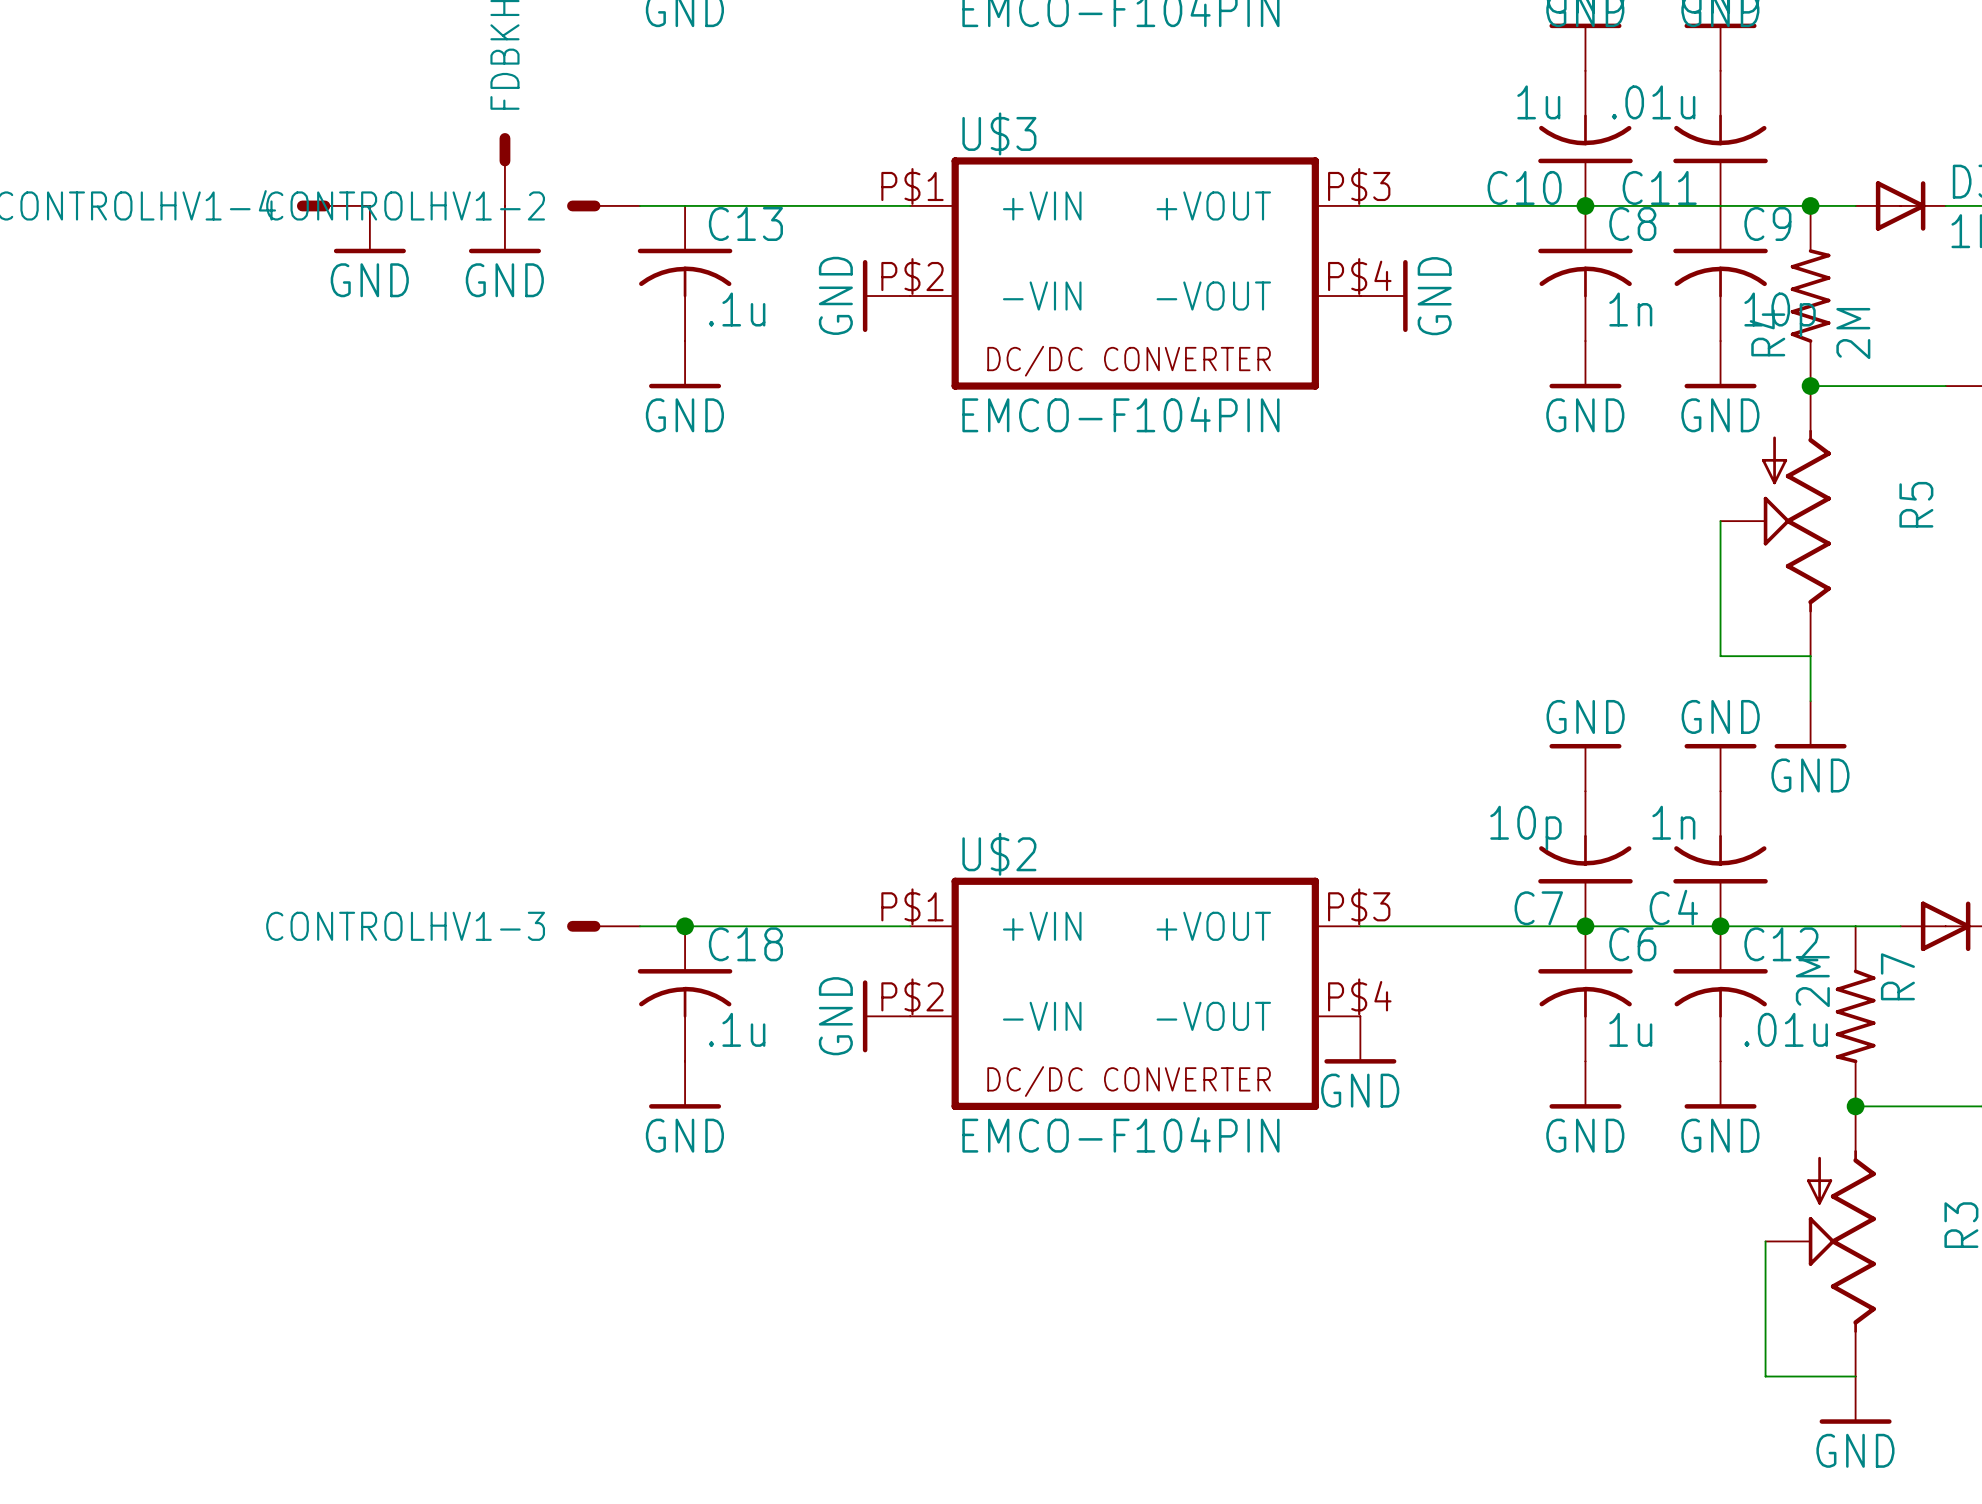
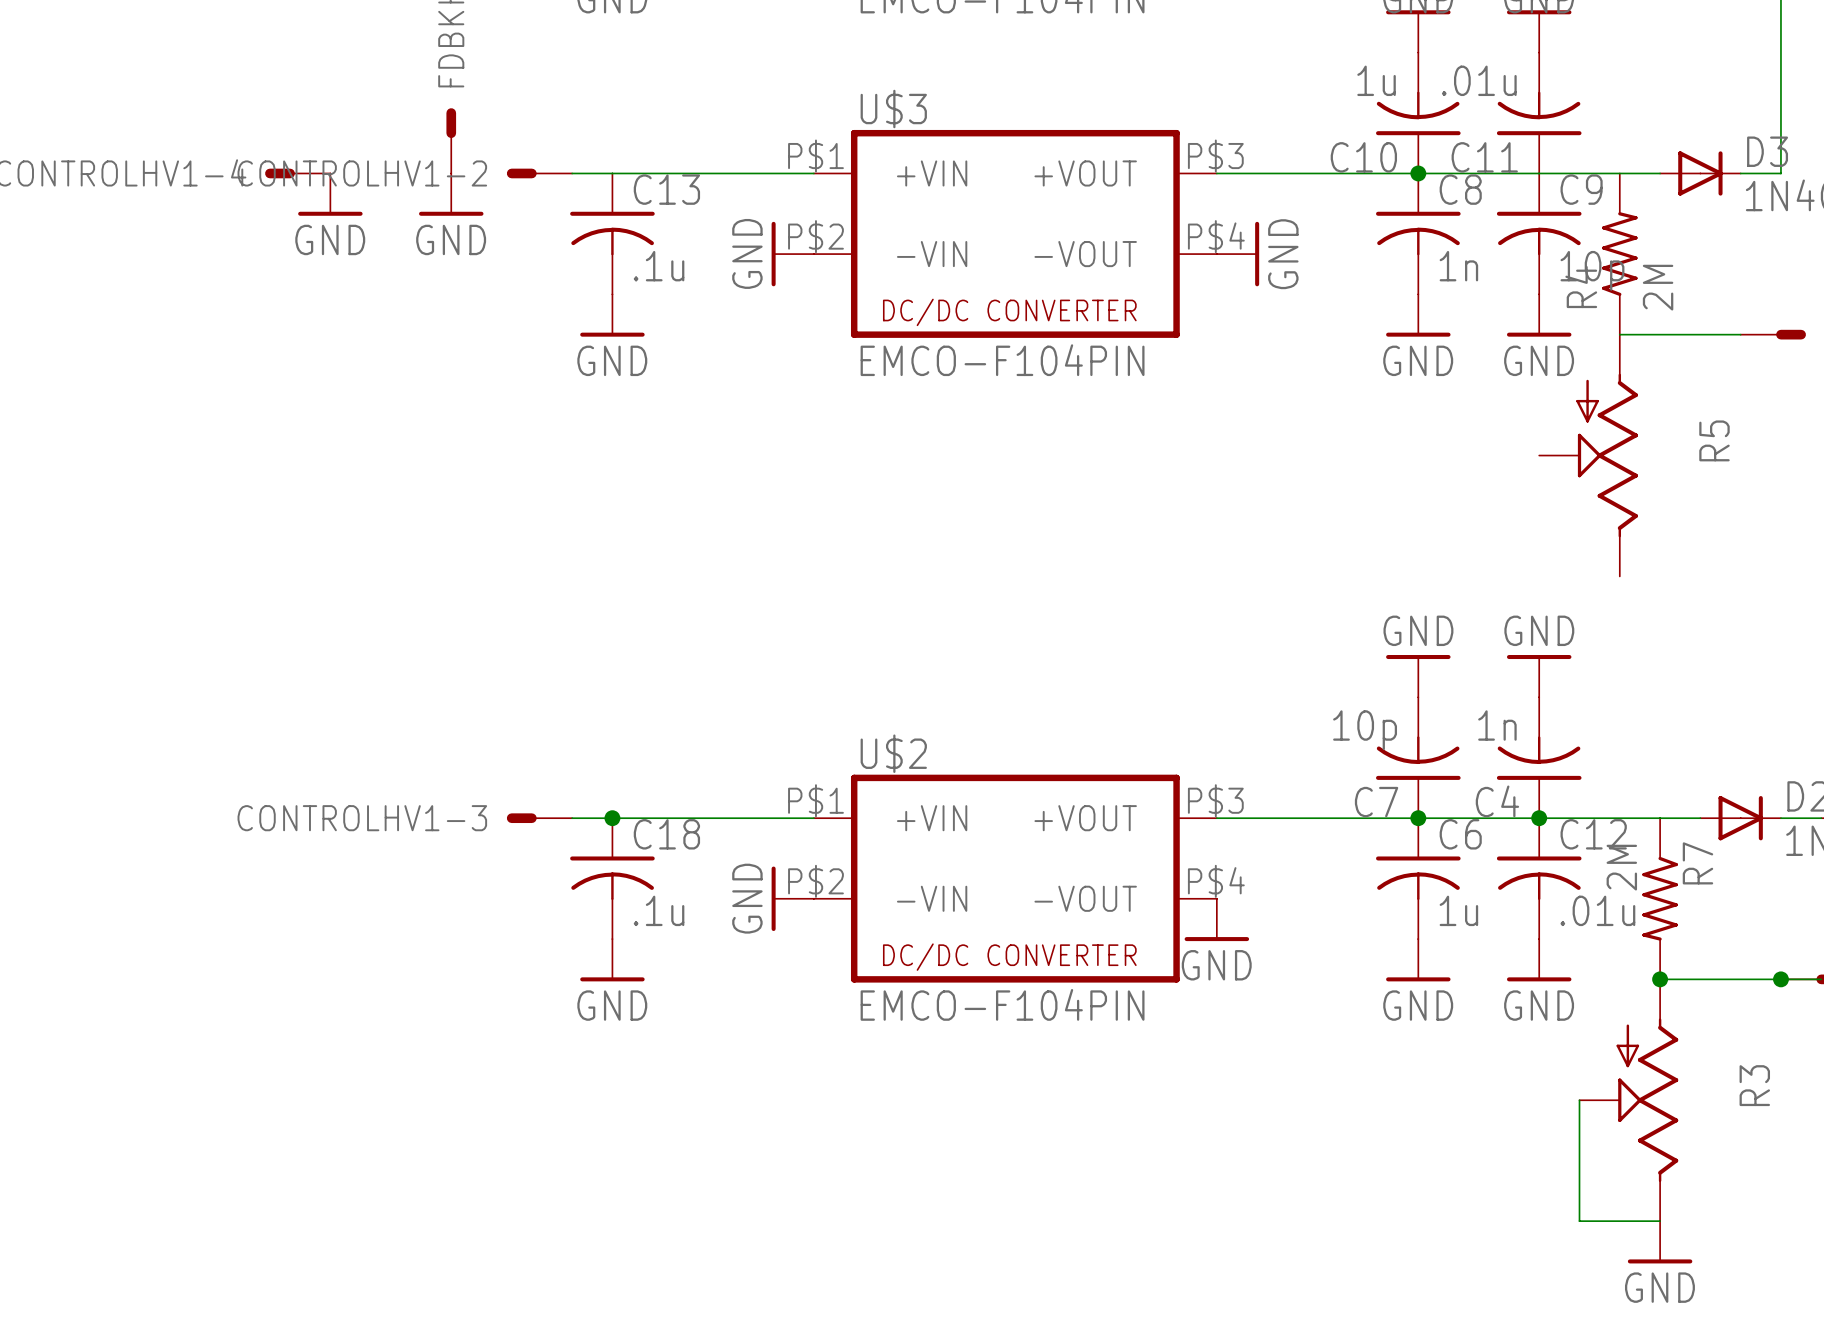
junction: (1810, 205) -> none
junction: (1810, 386) -> none
wire: (1720, 521) (1720, 656) (1810, 656) (1810, 701) -> none
power symbol: GND (1810, 724) -> none

